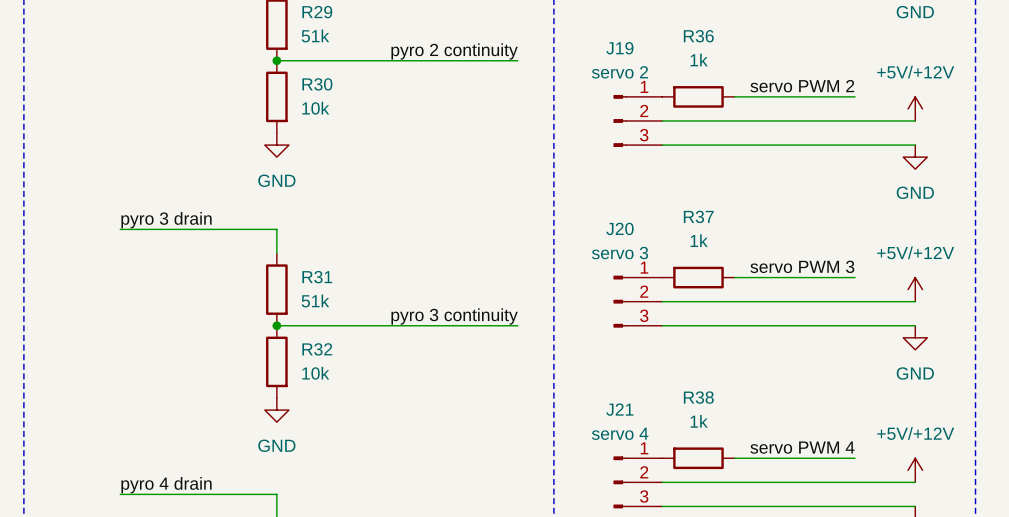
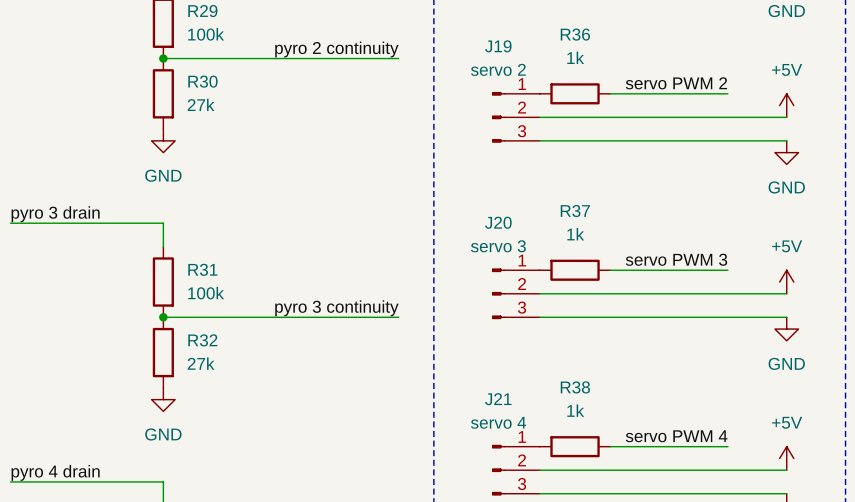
R29 value: 51k (315, 35) -> 100k (206, 34)
R30 value: 10k (315, 108) -> 27k (201, 104)
power symbol: +5V/+12V (915, 108) -> +5V (786, 105)
power symbol: +5V/+12V (915, 289) -> +5V (786, 282)
R31 value: 51k (315, 300) -> 100k (206, 293)
R32 value: 10k (315, 373) -> 27k (201, 363)
power symbol: +5V/+12V (915, 470) -> +5V (786, 458)

